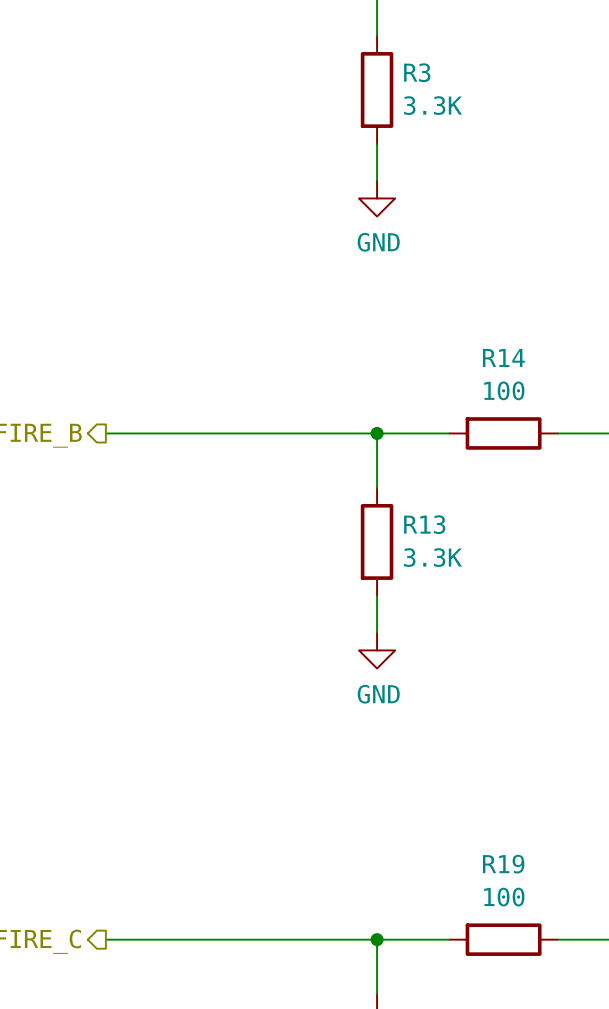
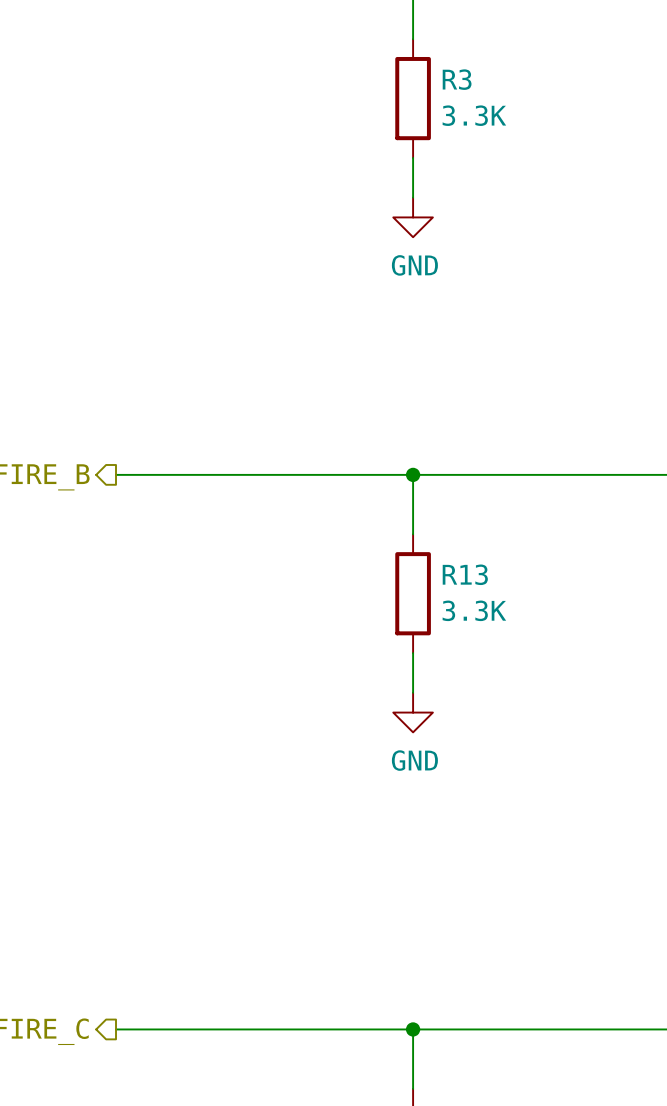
wire: none -> (492, 474) (611, 474)
R14: 100 (503, 433) -> none
wire: none -> (492, 1029) (611, 1029)
R19: 100 (503, 939) -> none

